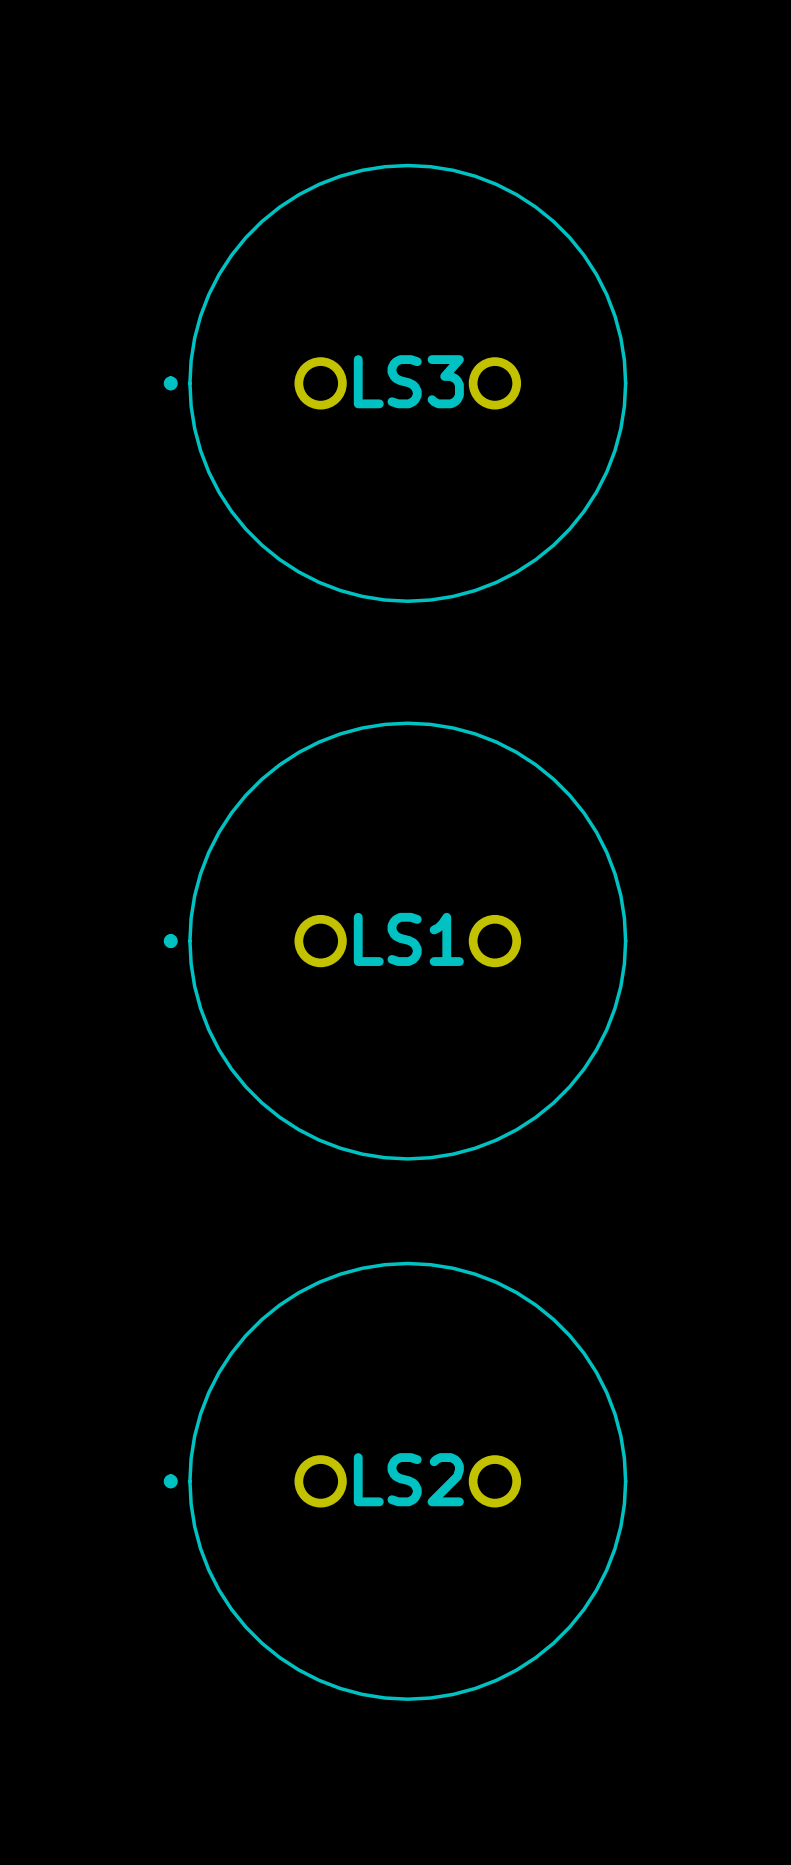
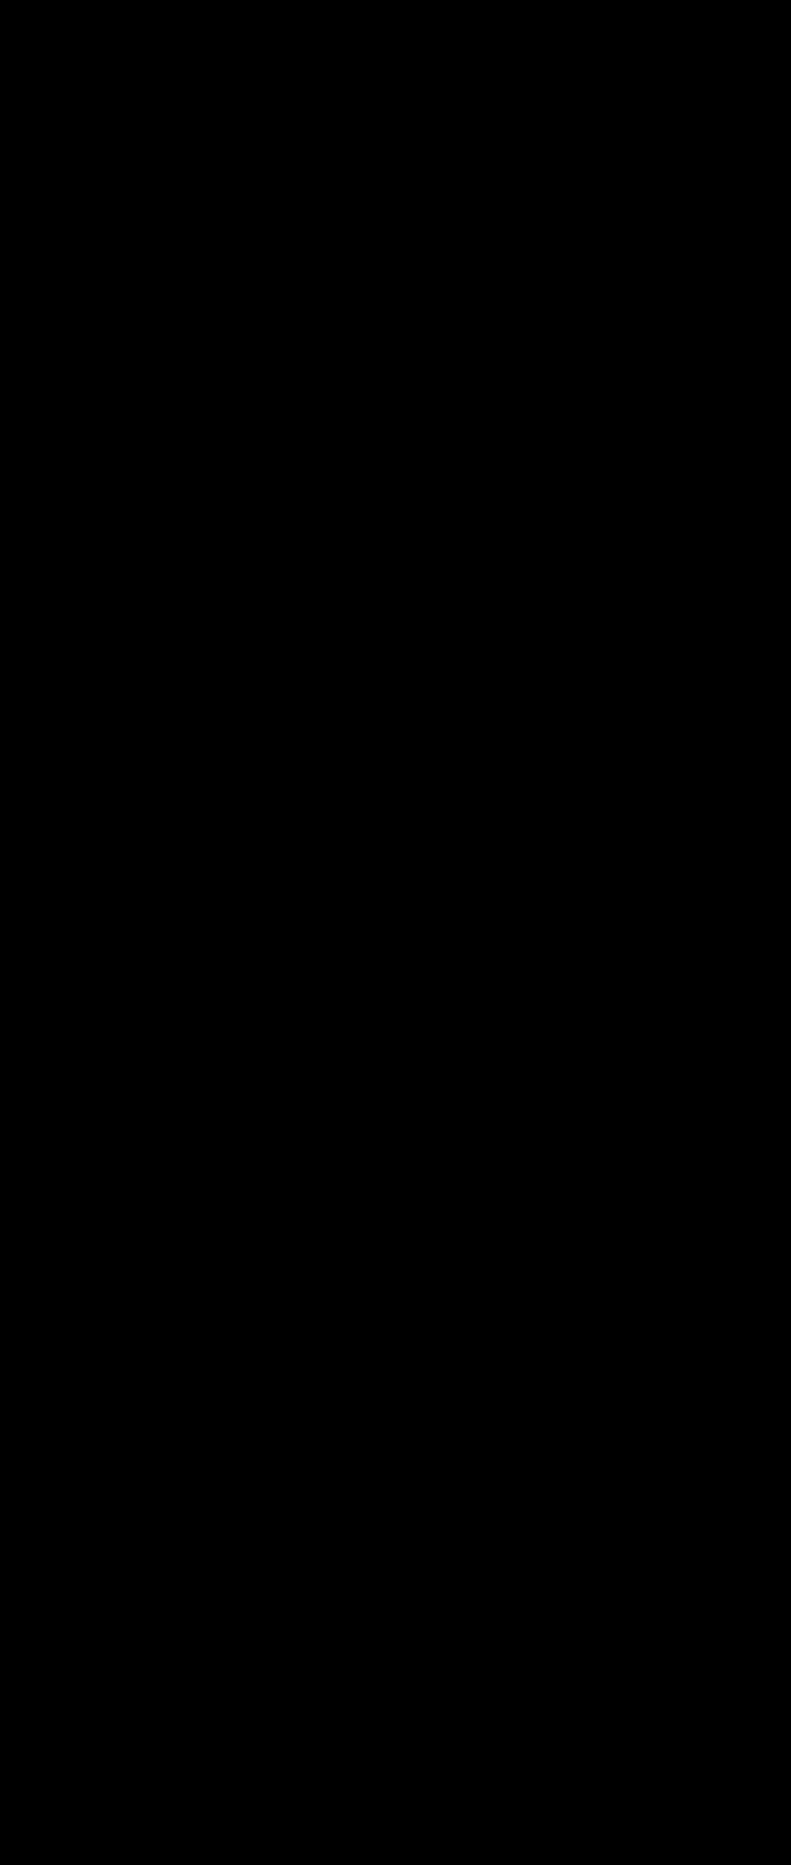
LS3: (395, 383) -> none
LS1: (395, 941) -> none
LS2: (395, 1481) -> none

